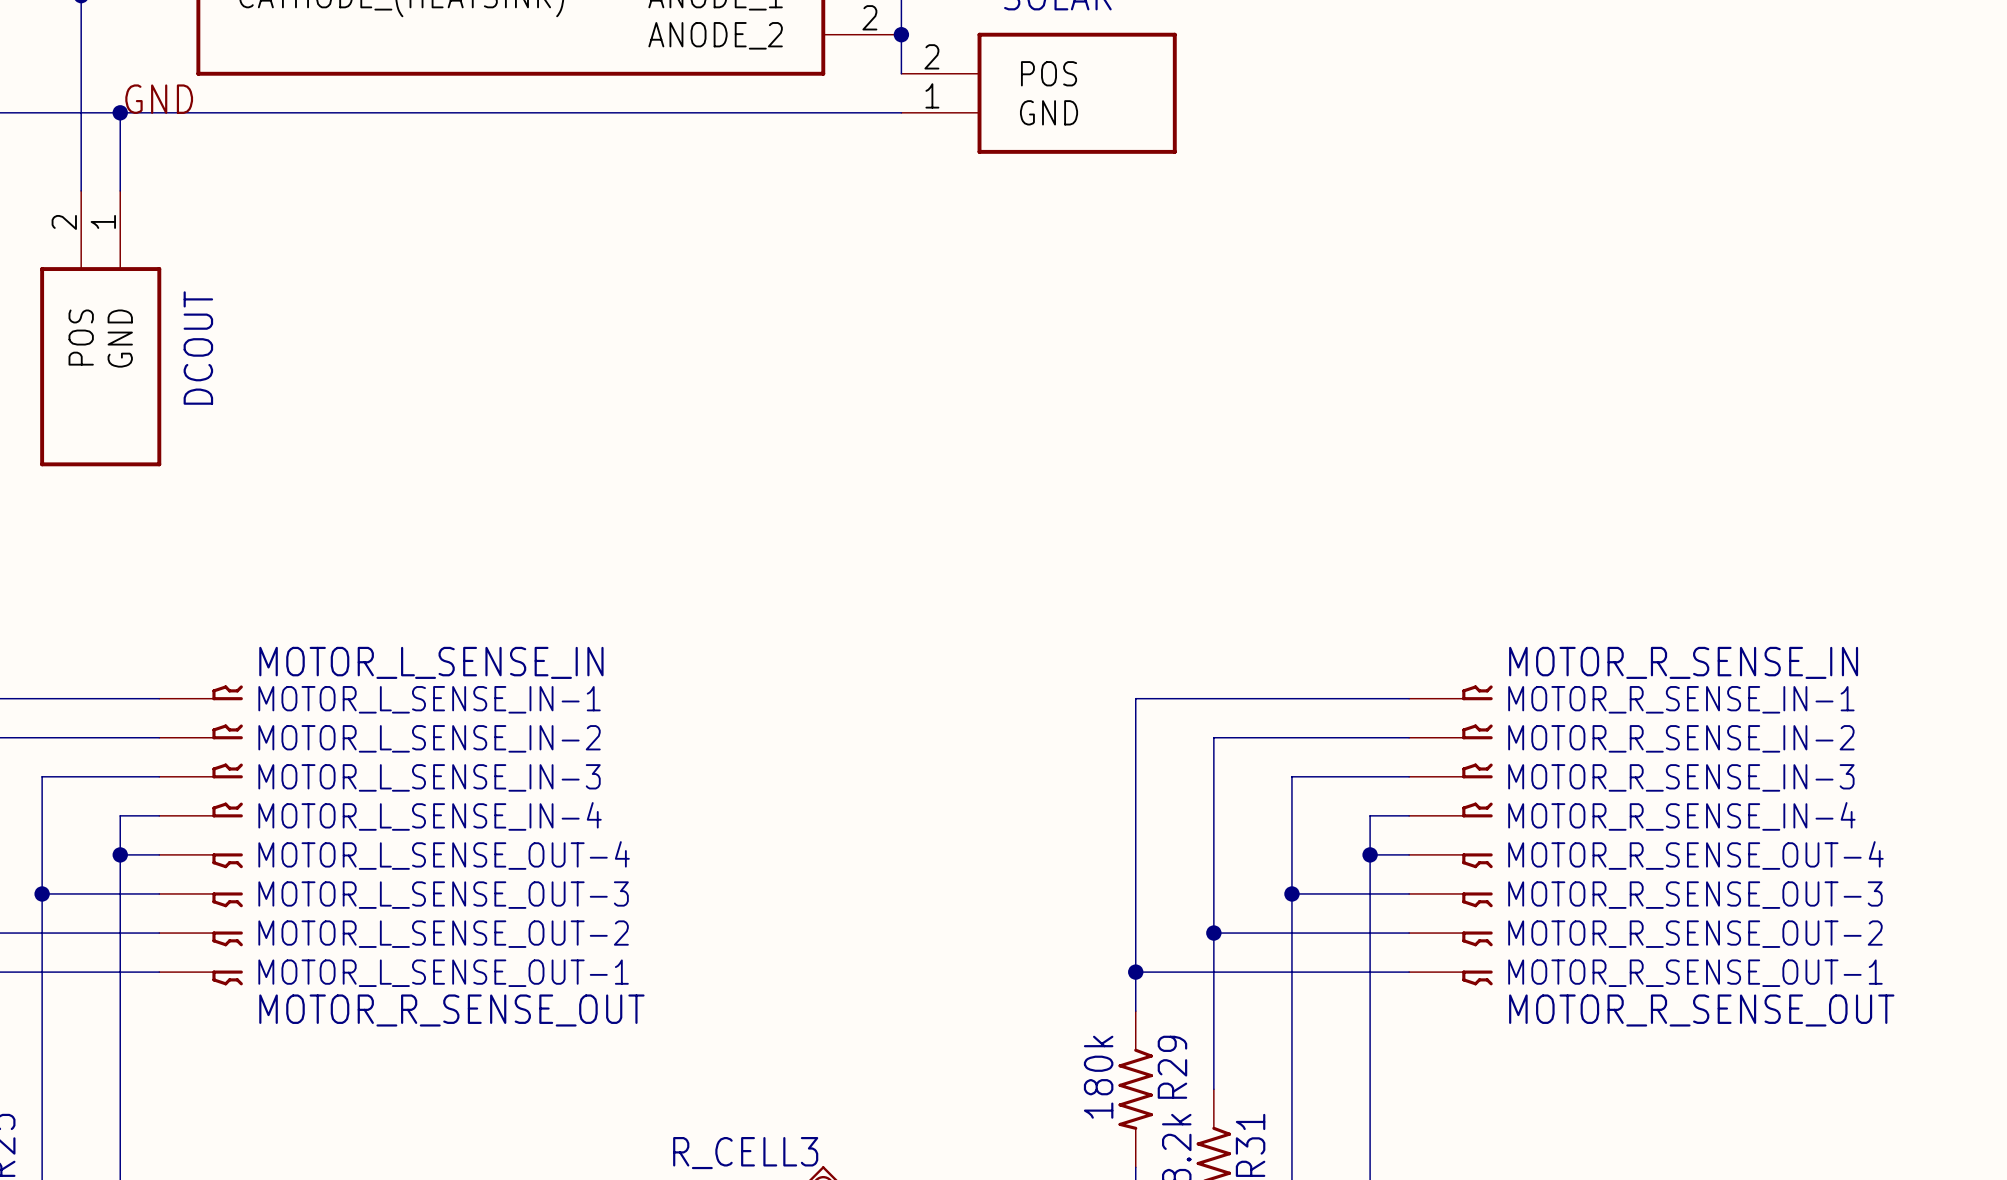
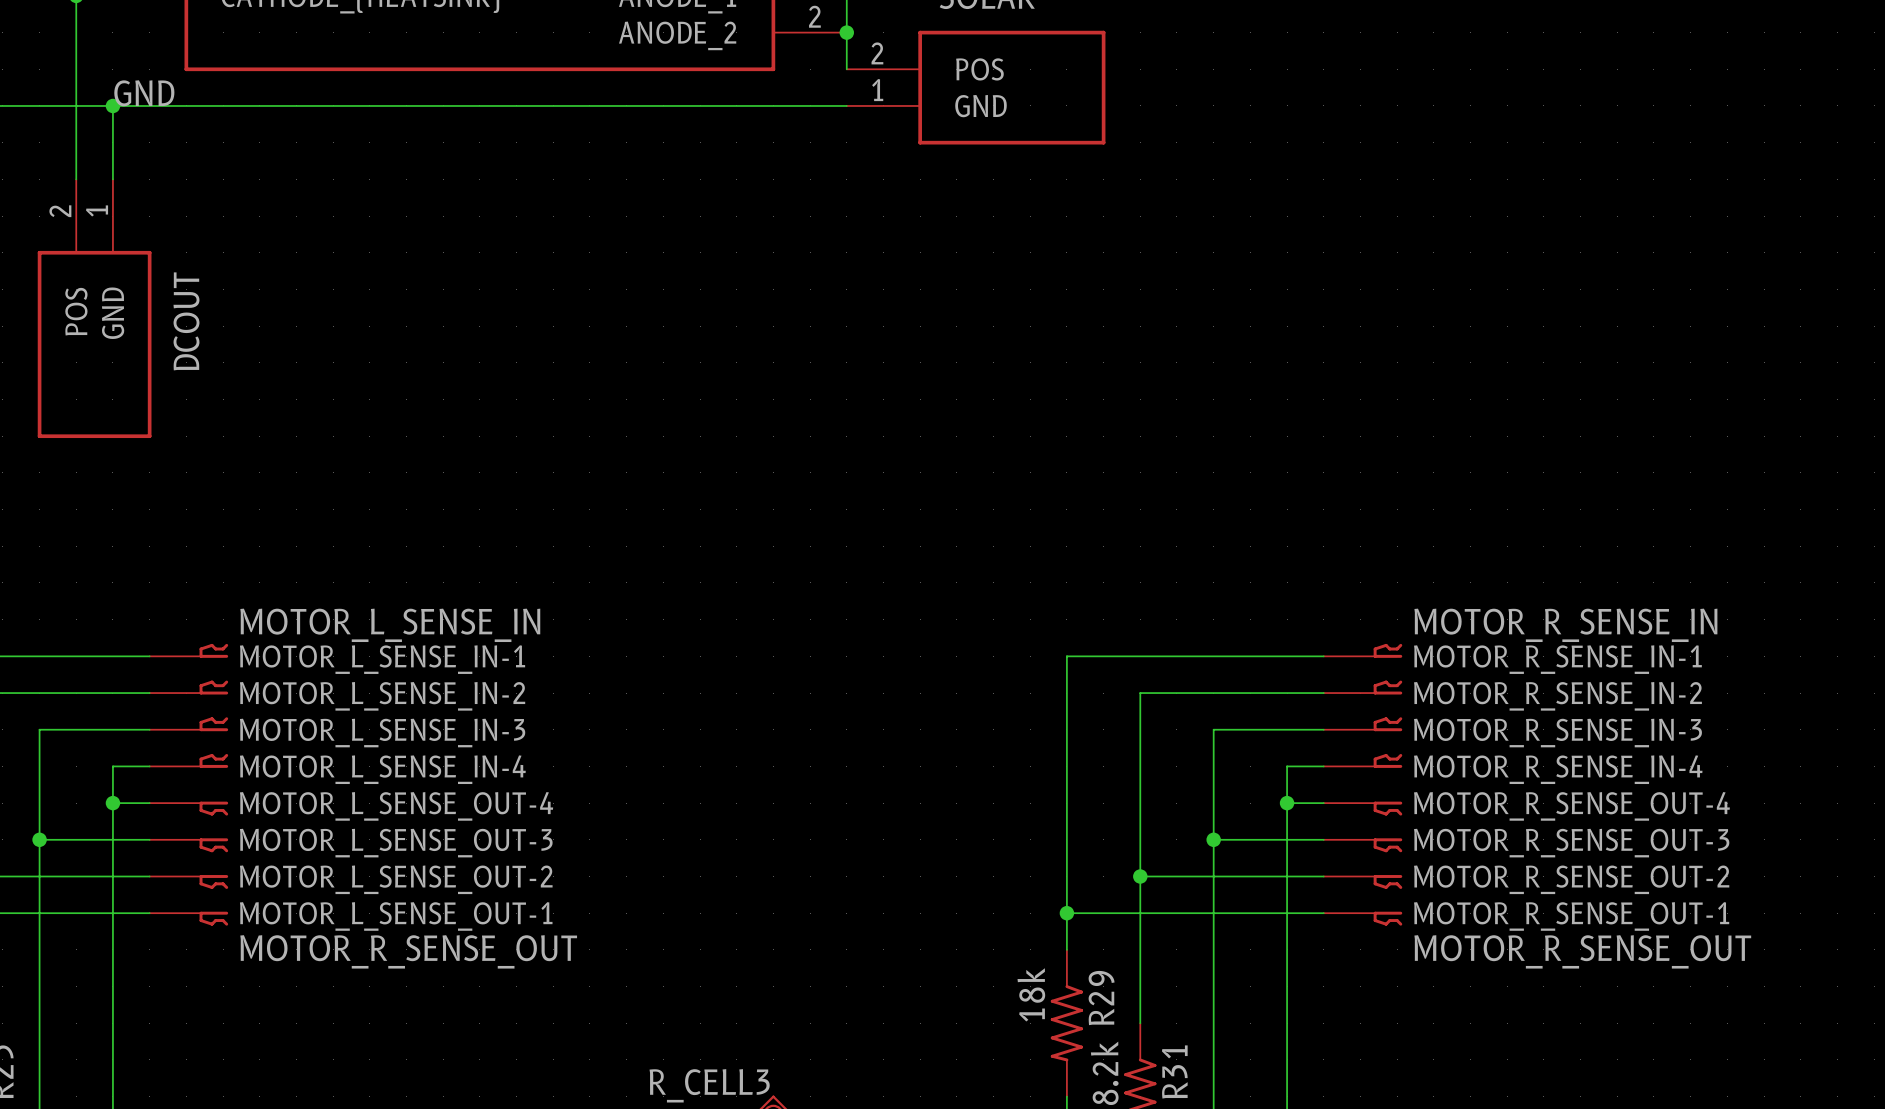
R29 value: 180k (1098, 1077) -> 18k (1031, 994)

